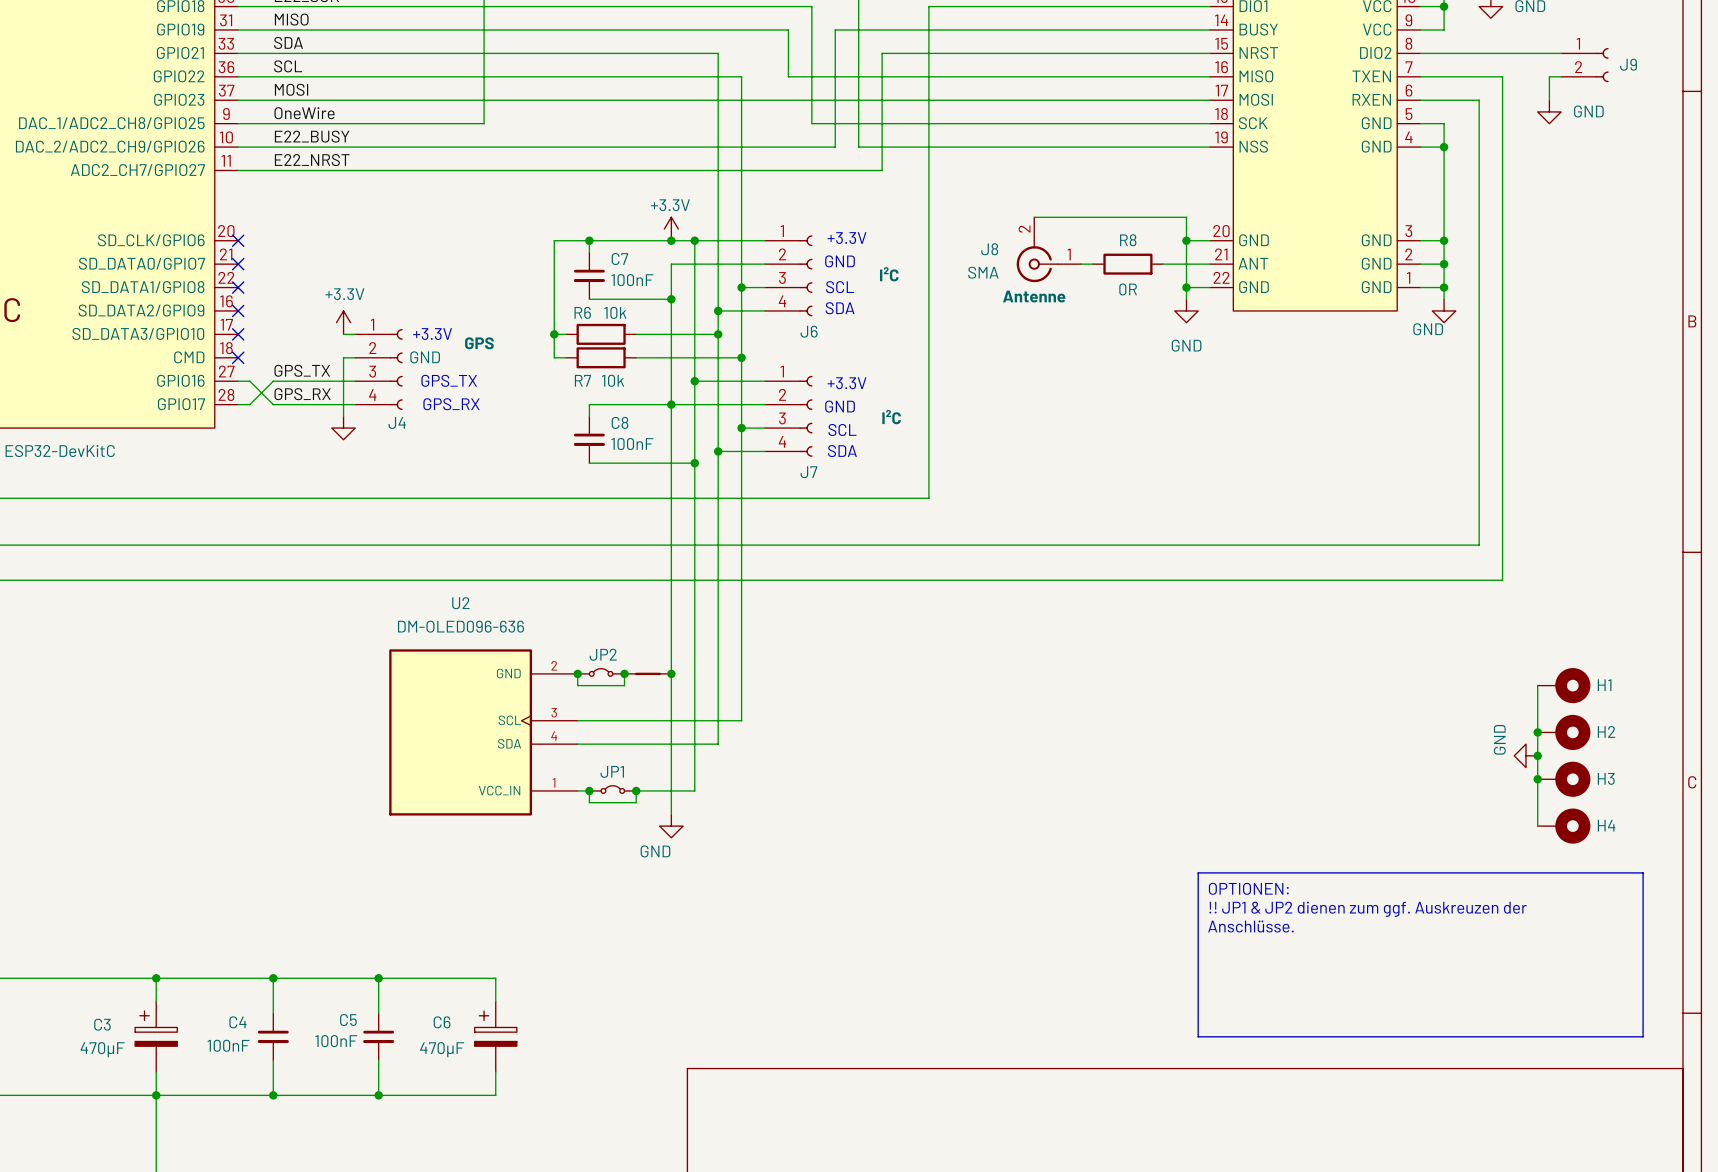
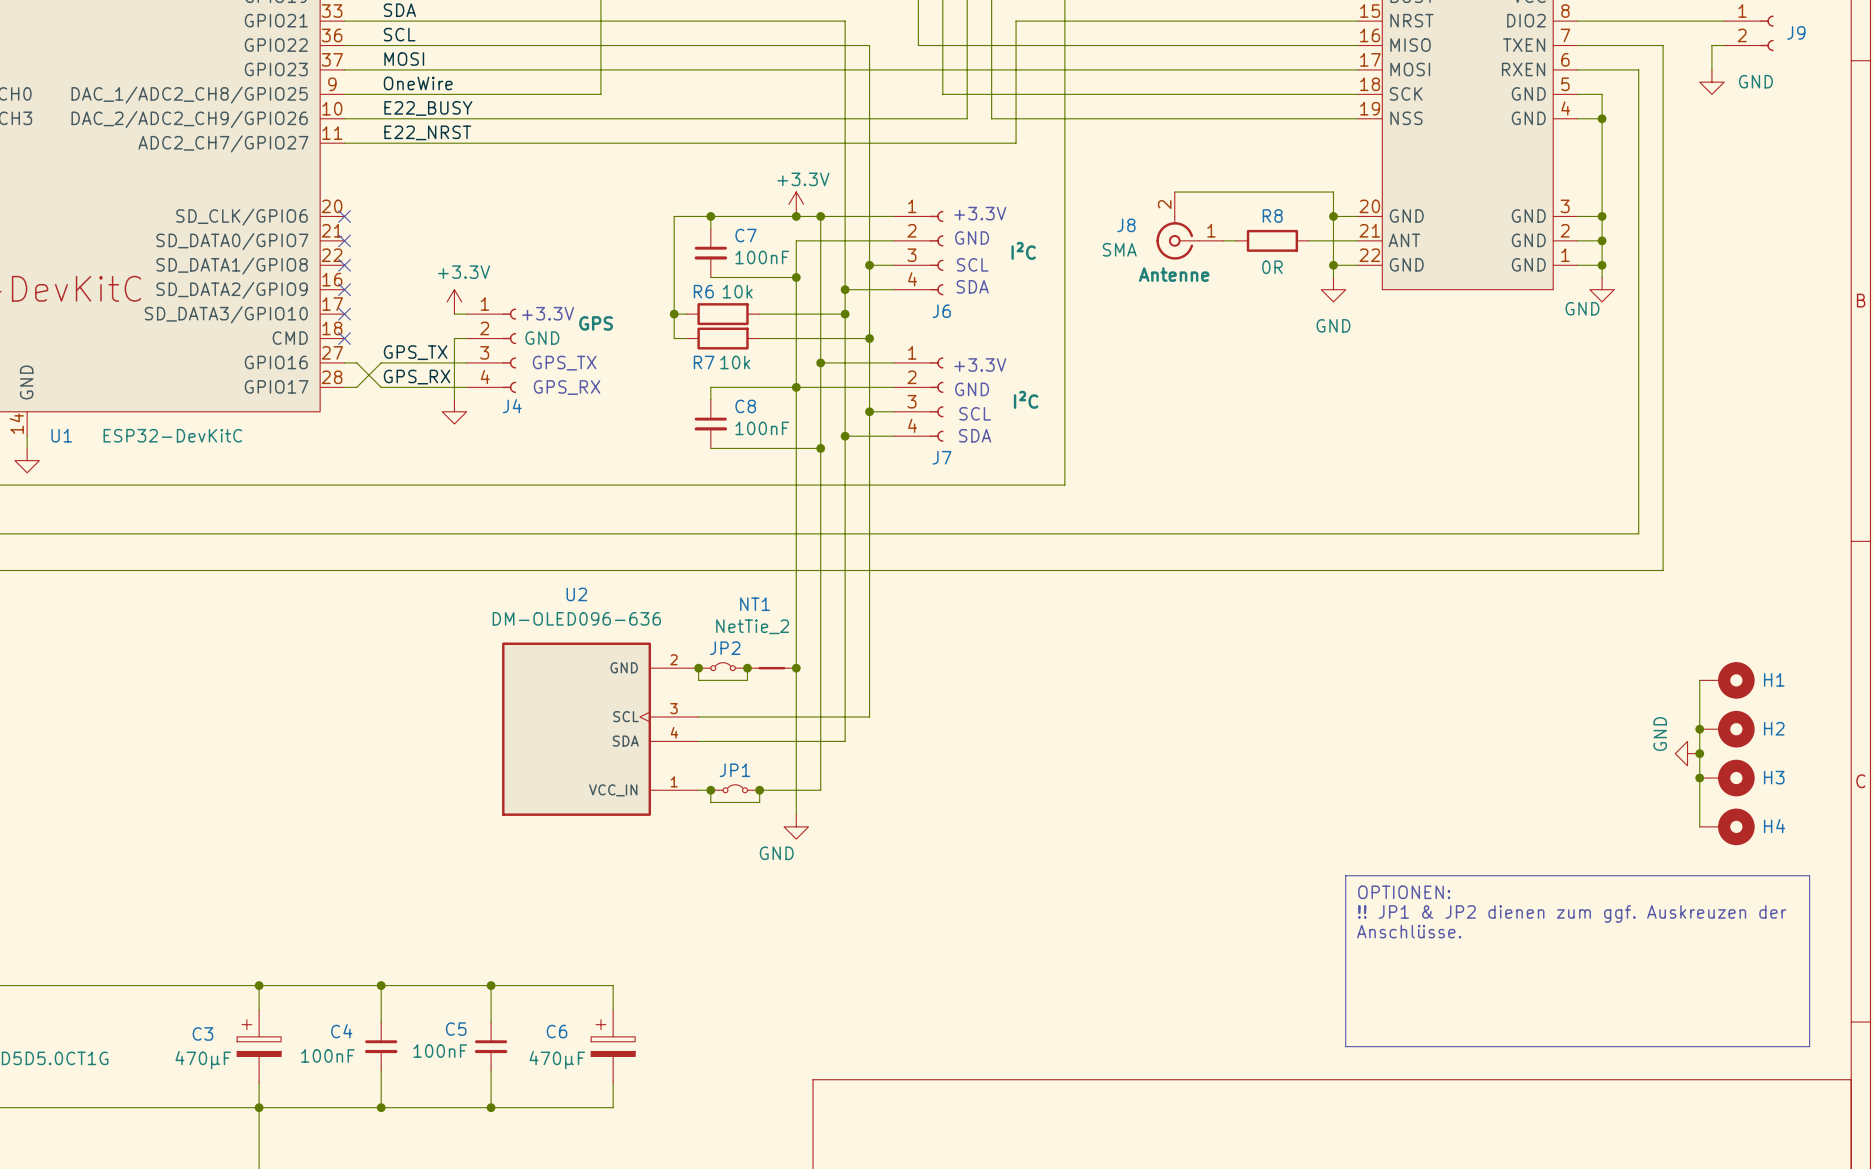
NT1 name: none -> NT1 (755, 604)
NT1 value: none -> NetTie_2 (752, 626)

